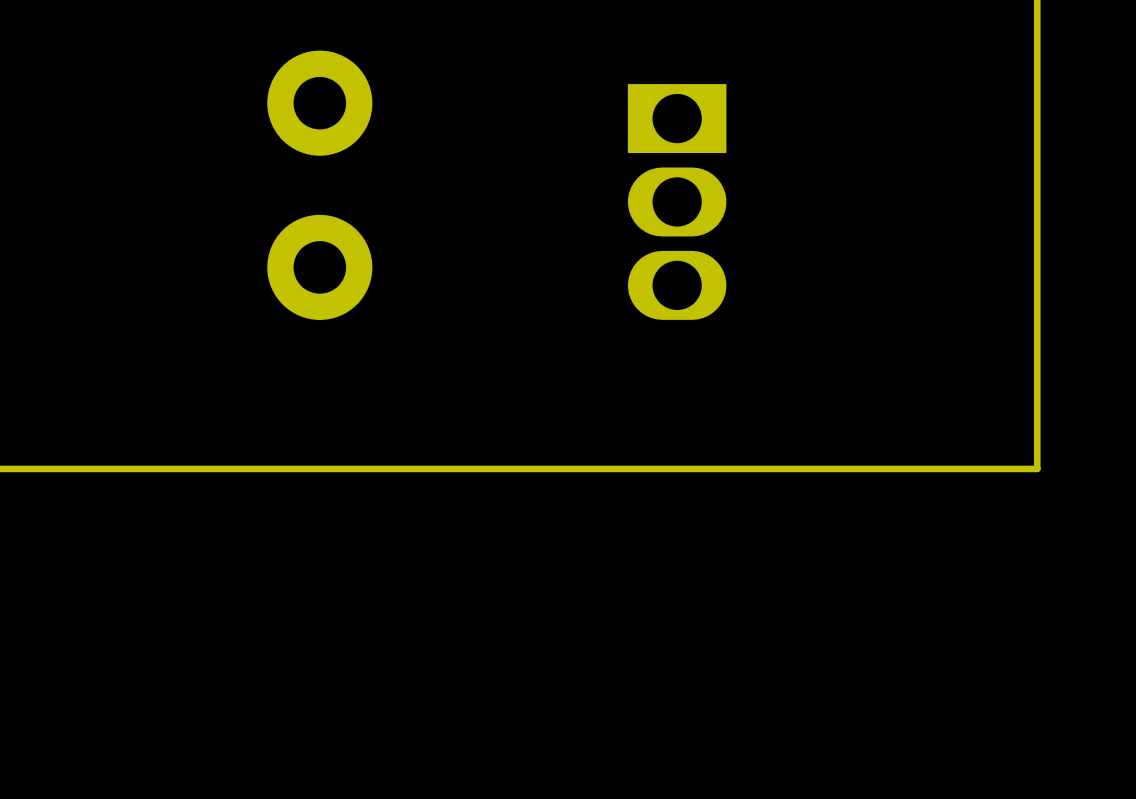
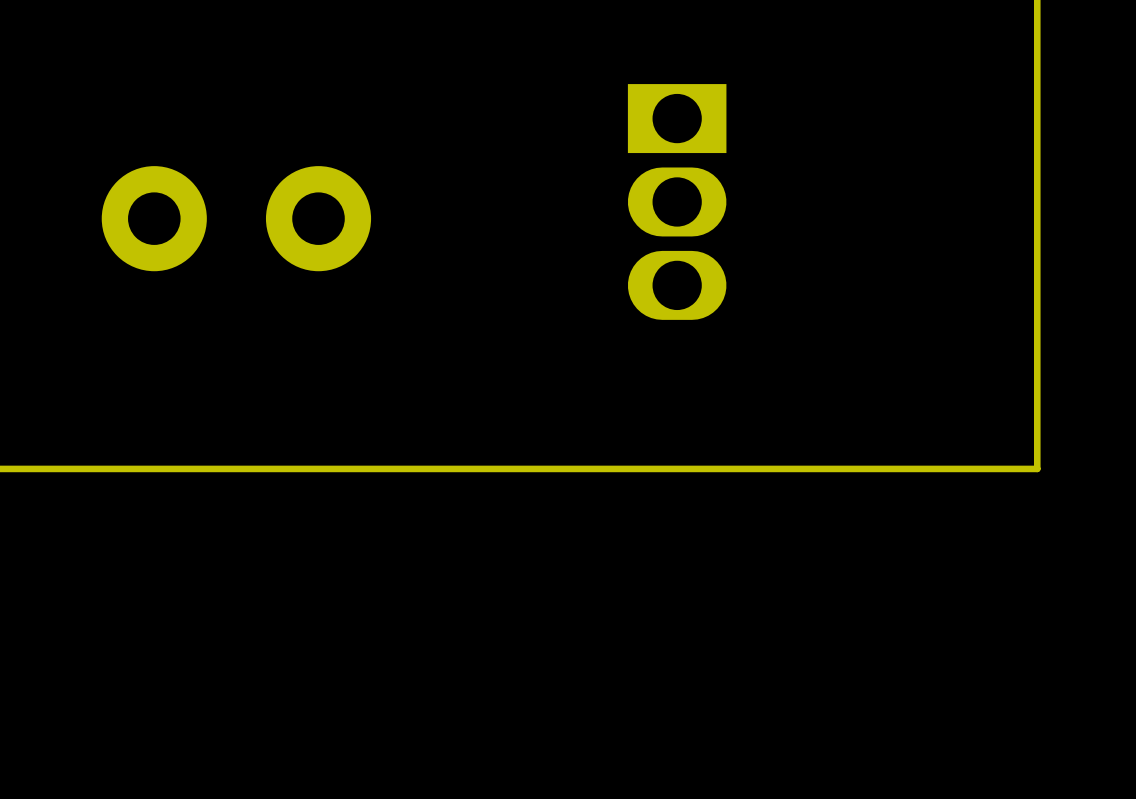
part rotation: 0° (319, 185) -> 90° clockwise (236, 218)

